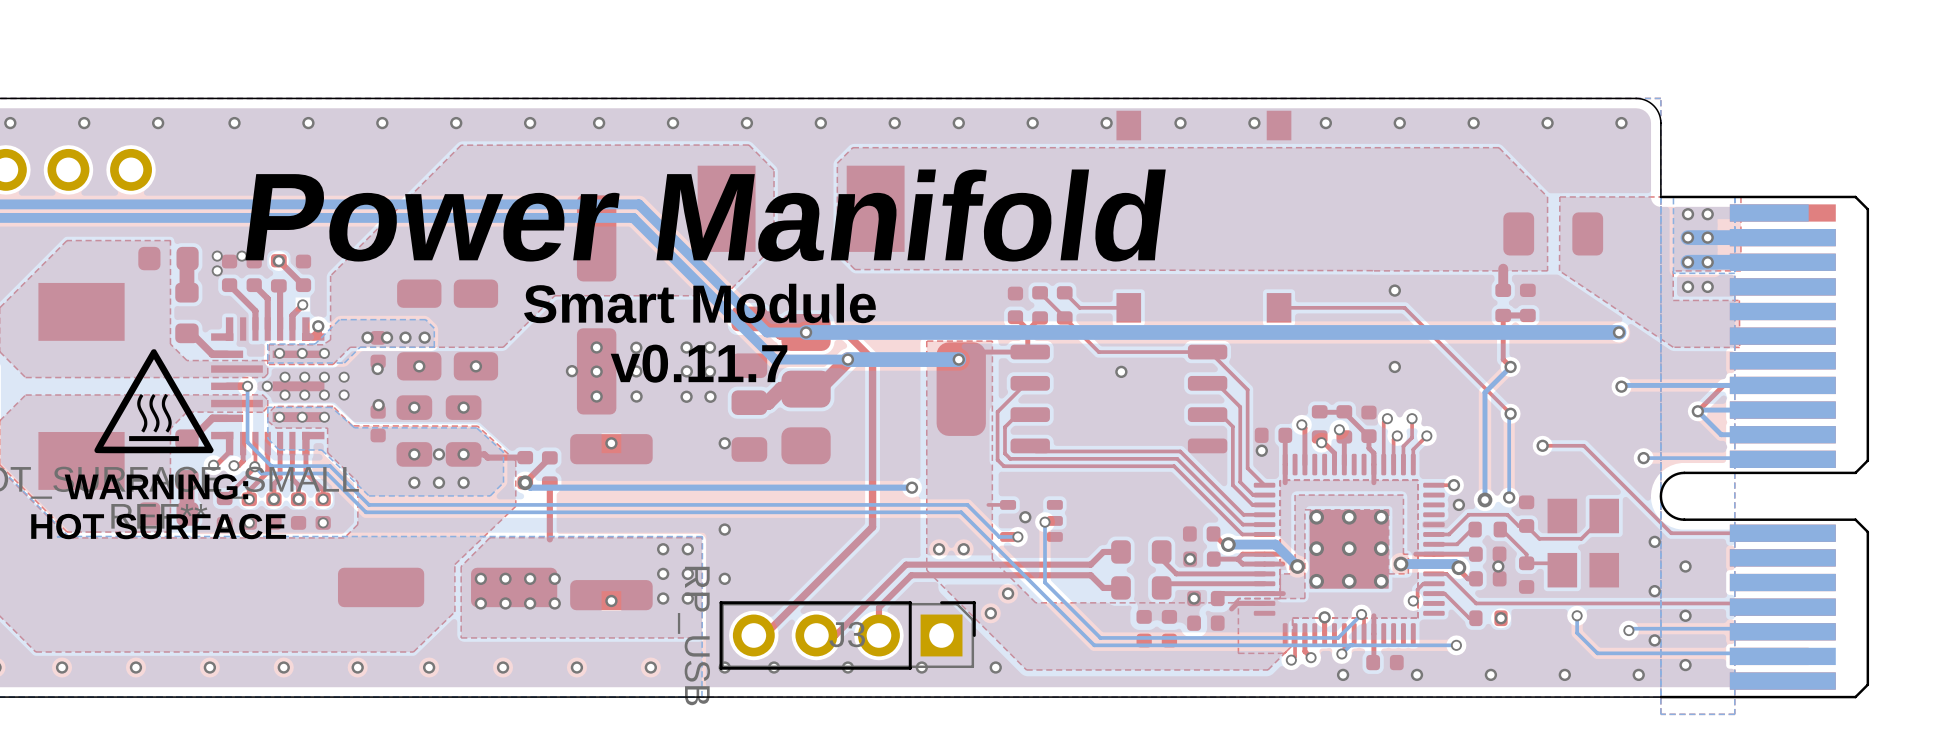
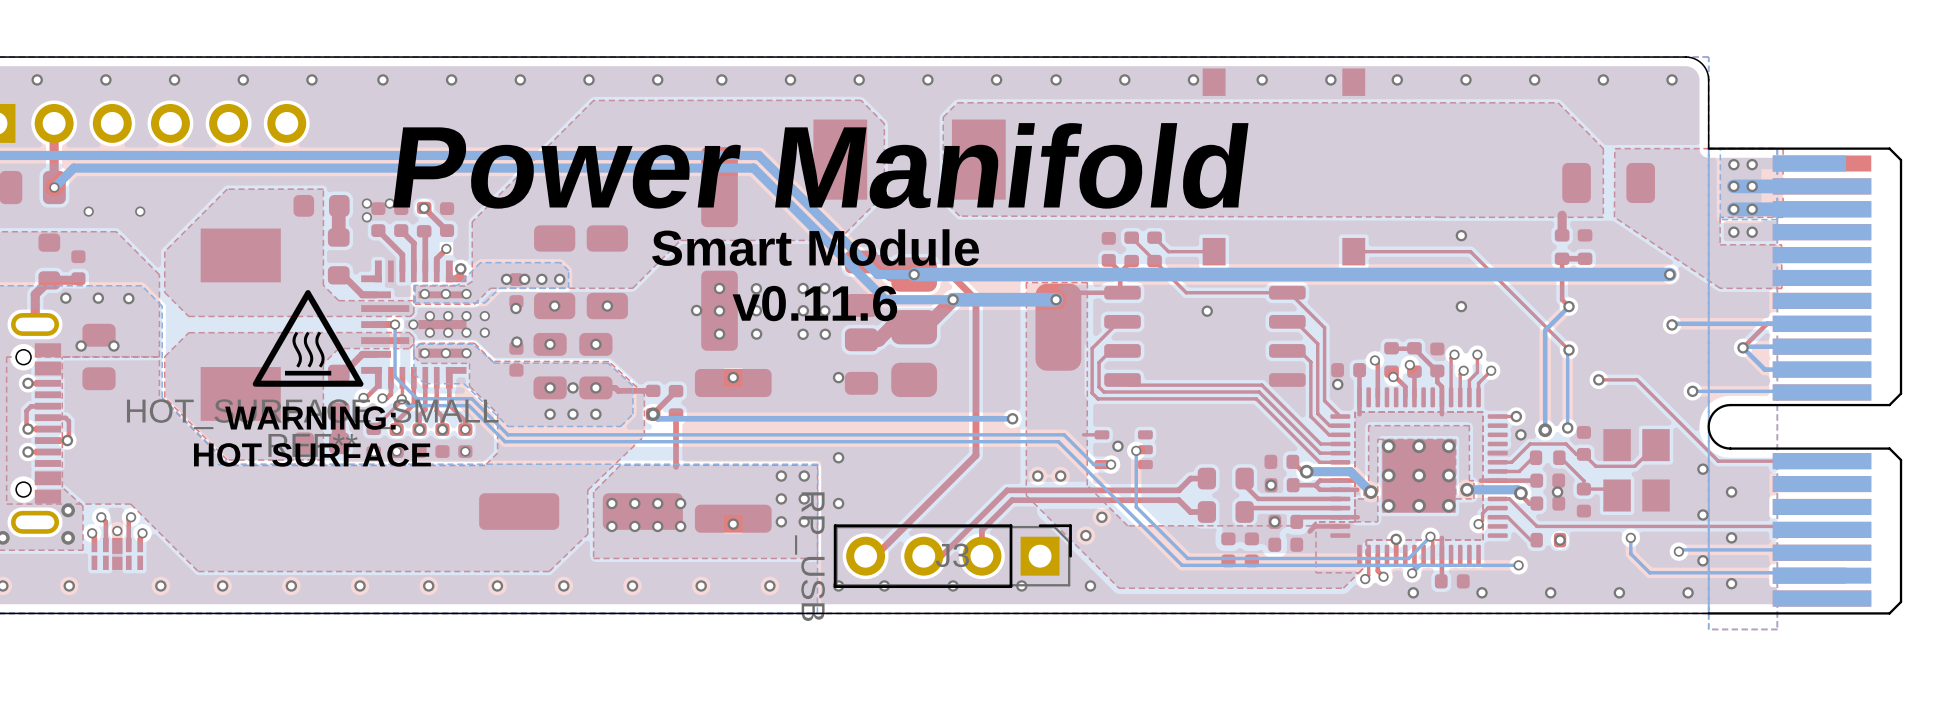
text: v0.11.7 (699, 363) -> v0.11.6 (814, 303)

